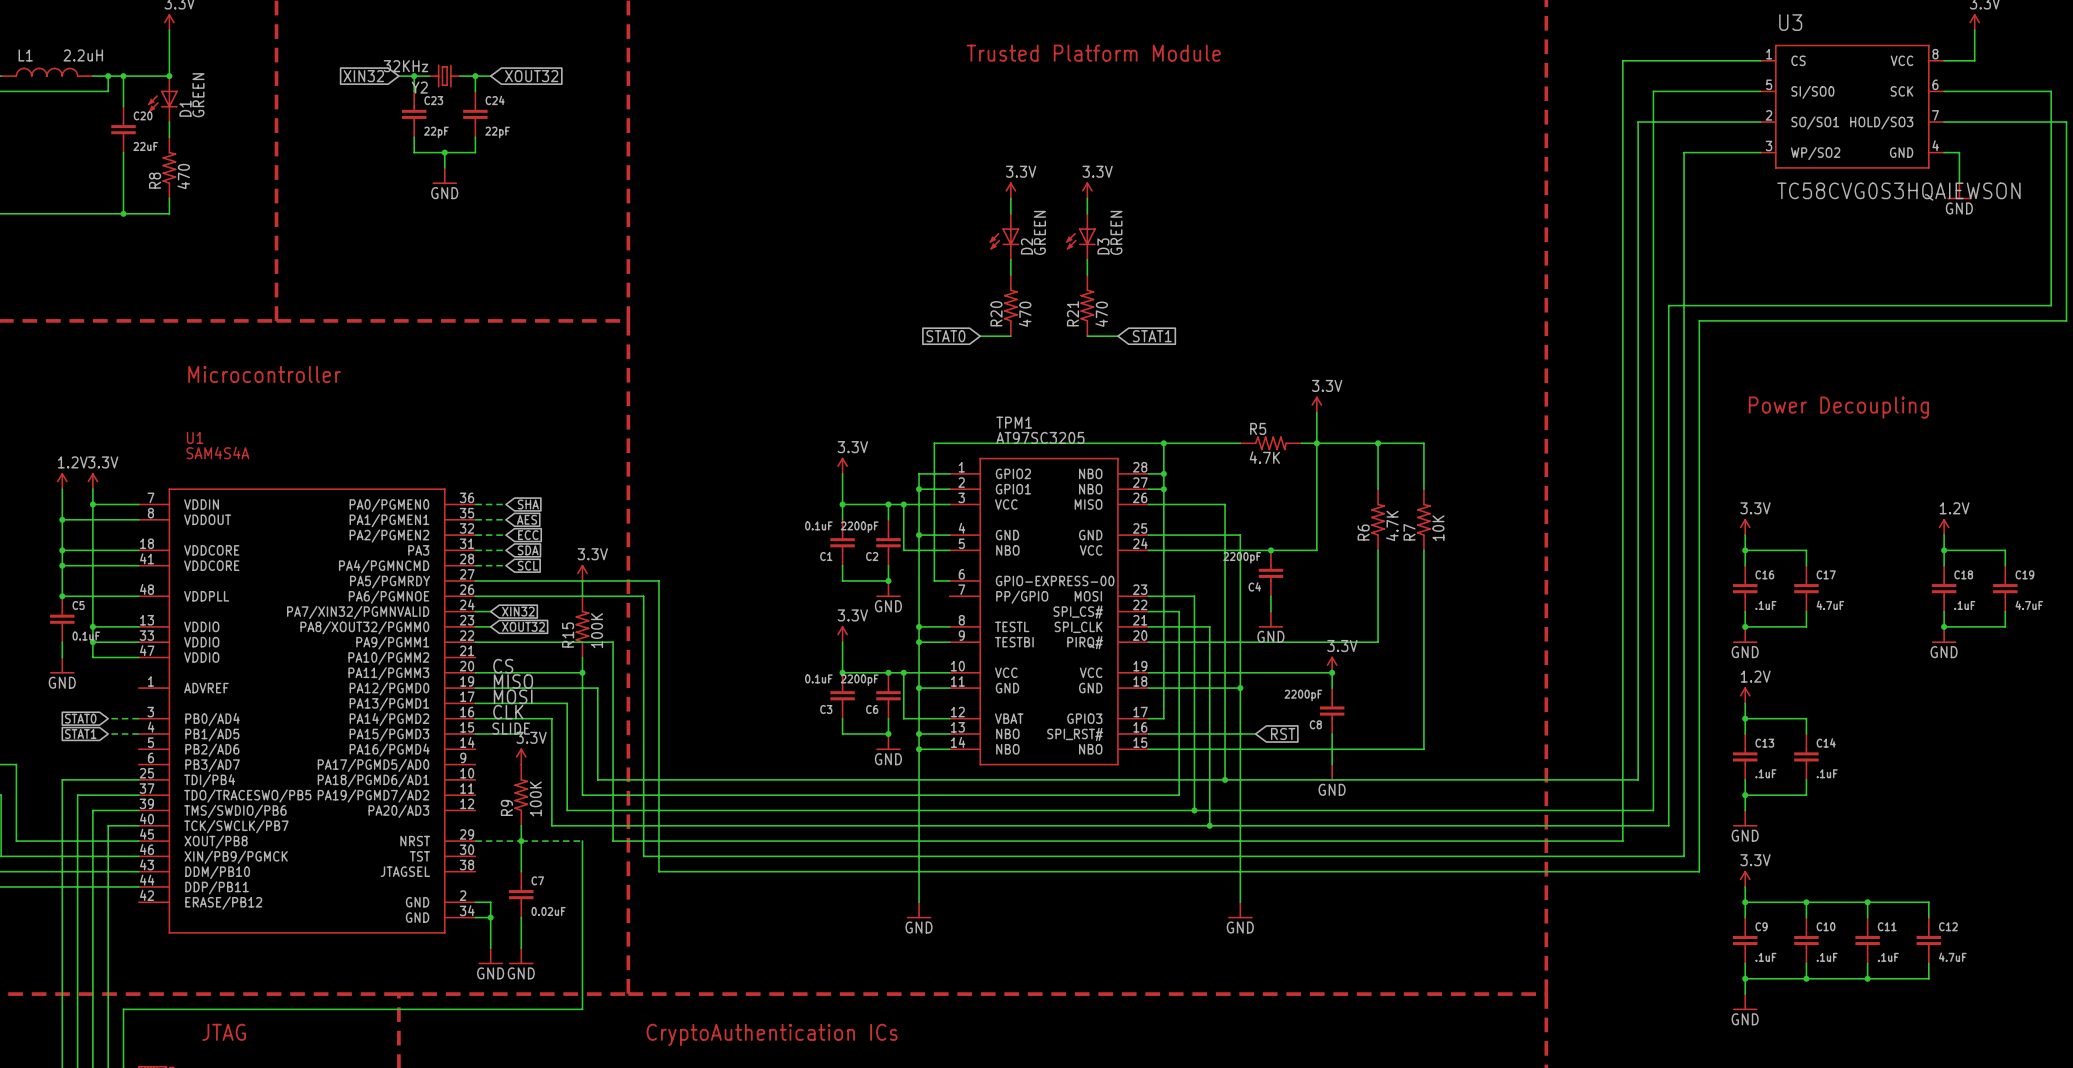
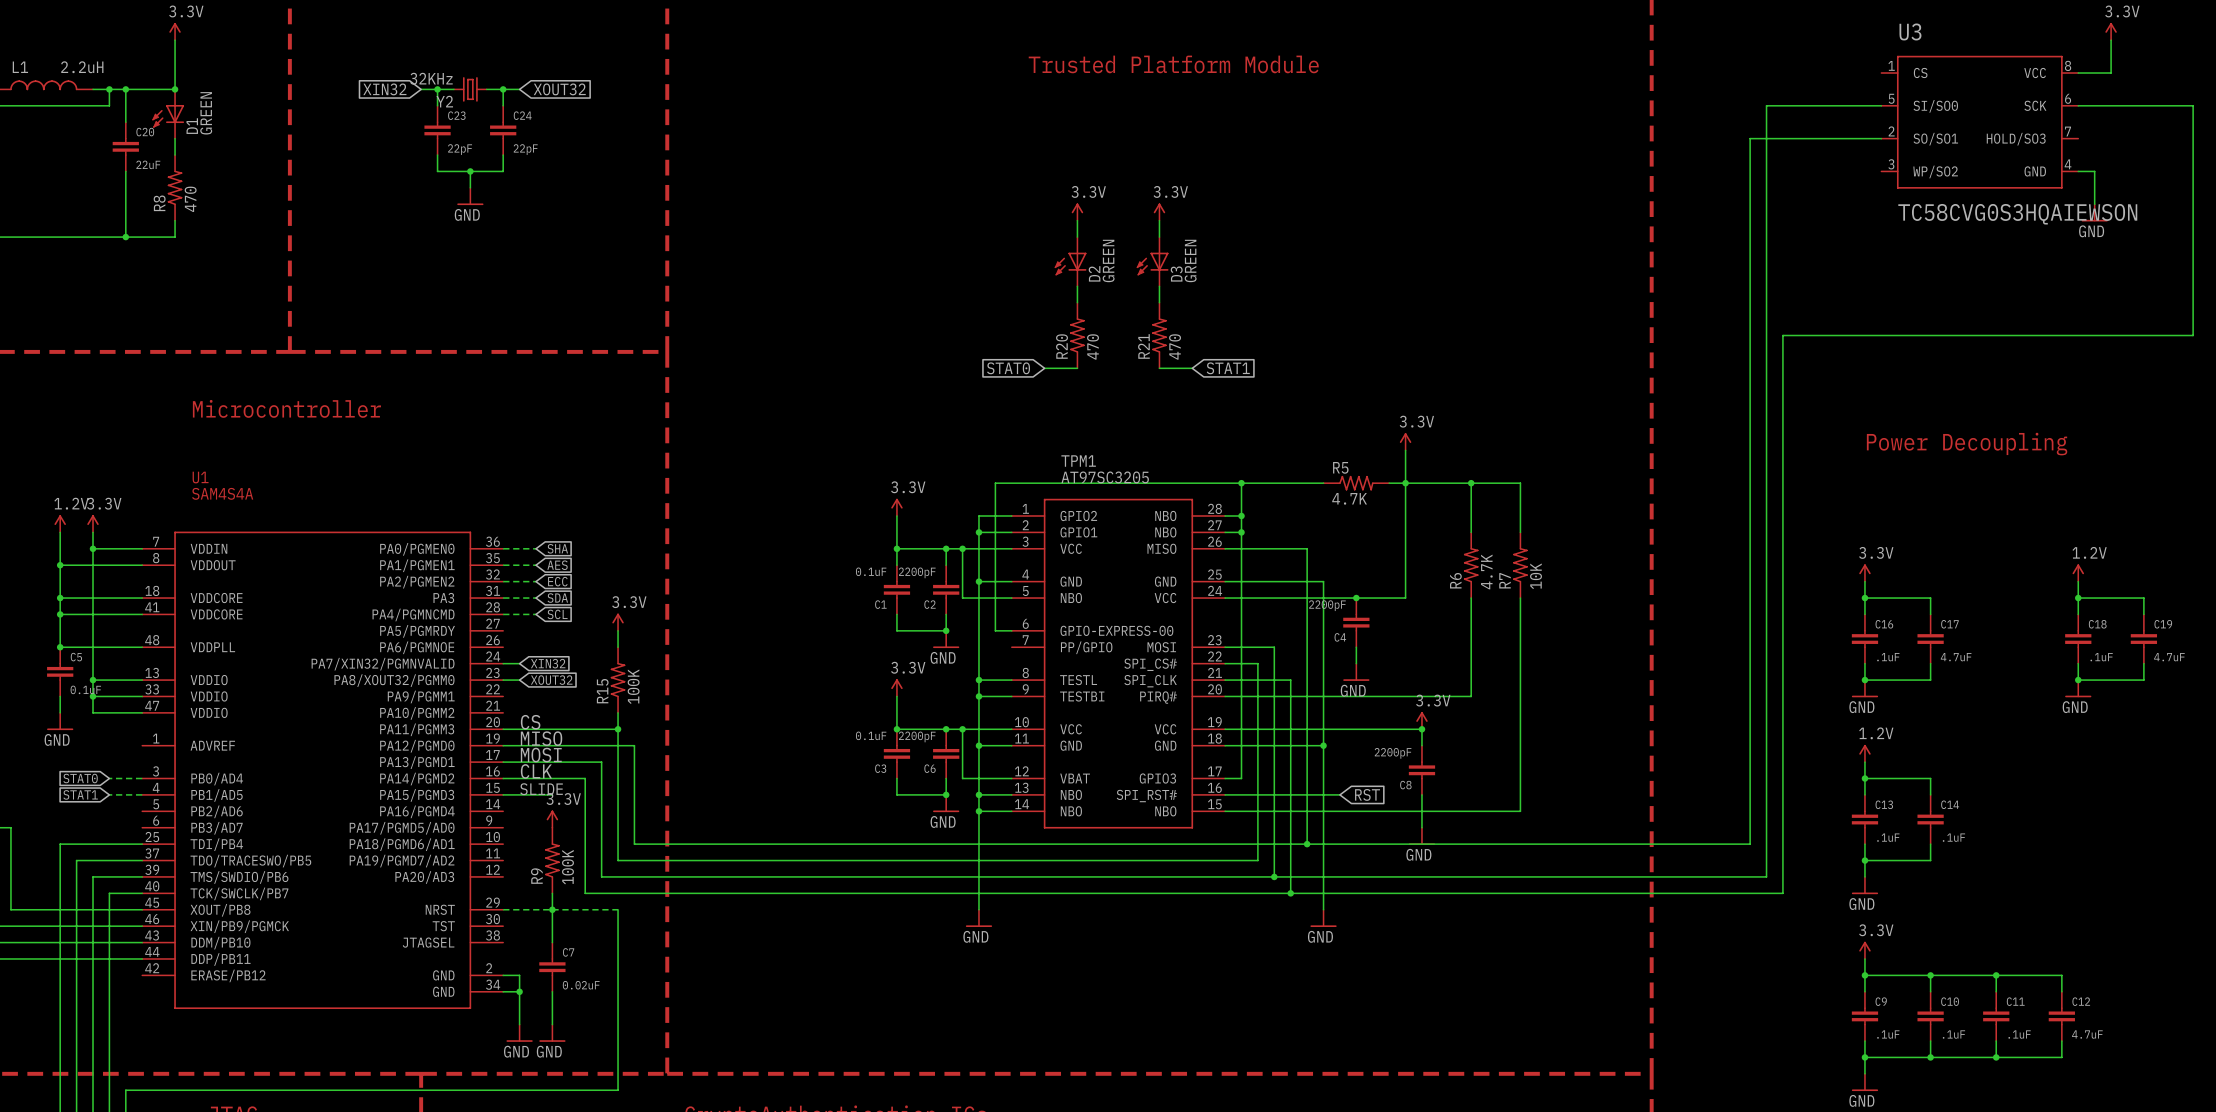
wire: (1760, 60) (1622, 60) (1622, 841) (613, 841) (613, 642) (475, 642) -> none
wire: (1944, 122) (2066, 122) (2066, 320) (1699, 320) (1699, 871) (658, 871) (658, 580) (475, 580) -> none
wire: (1760, 152) (1684, 152) (1684, 856) (643, 856) (643, 596) (475, 596) -> none
wire: (919, 841) (919, 902) -> none
wire: (1240, 841) (1240, 902) -> none
power symbol position: GND (919, 910) -> GND (978, 918)
power symbol position: GND (1240, 910) -> GND (1323, 918)

